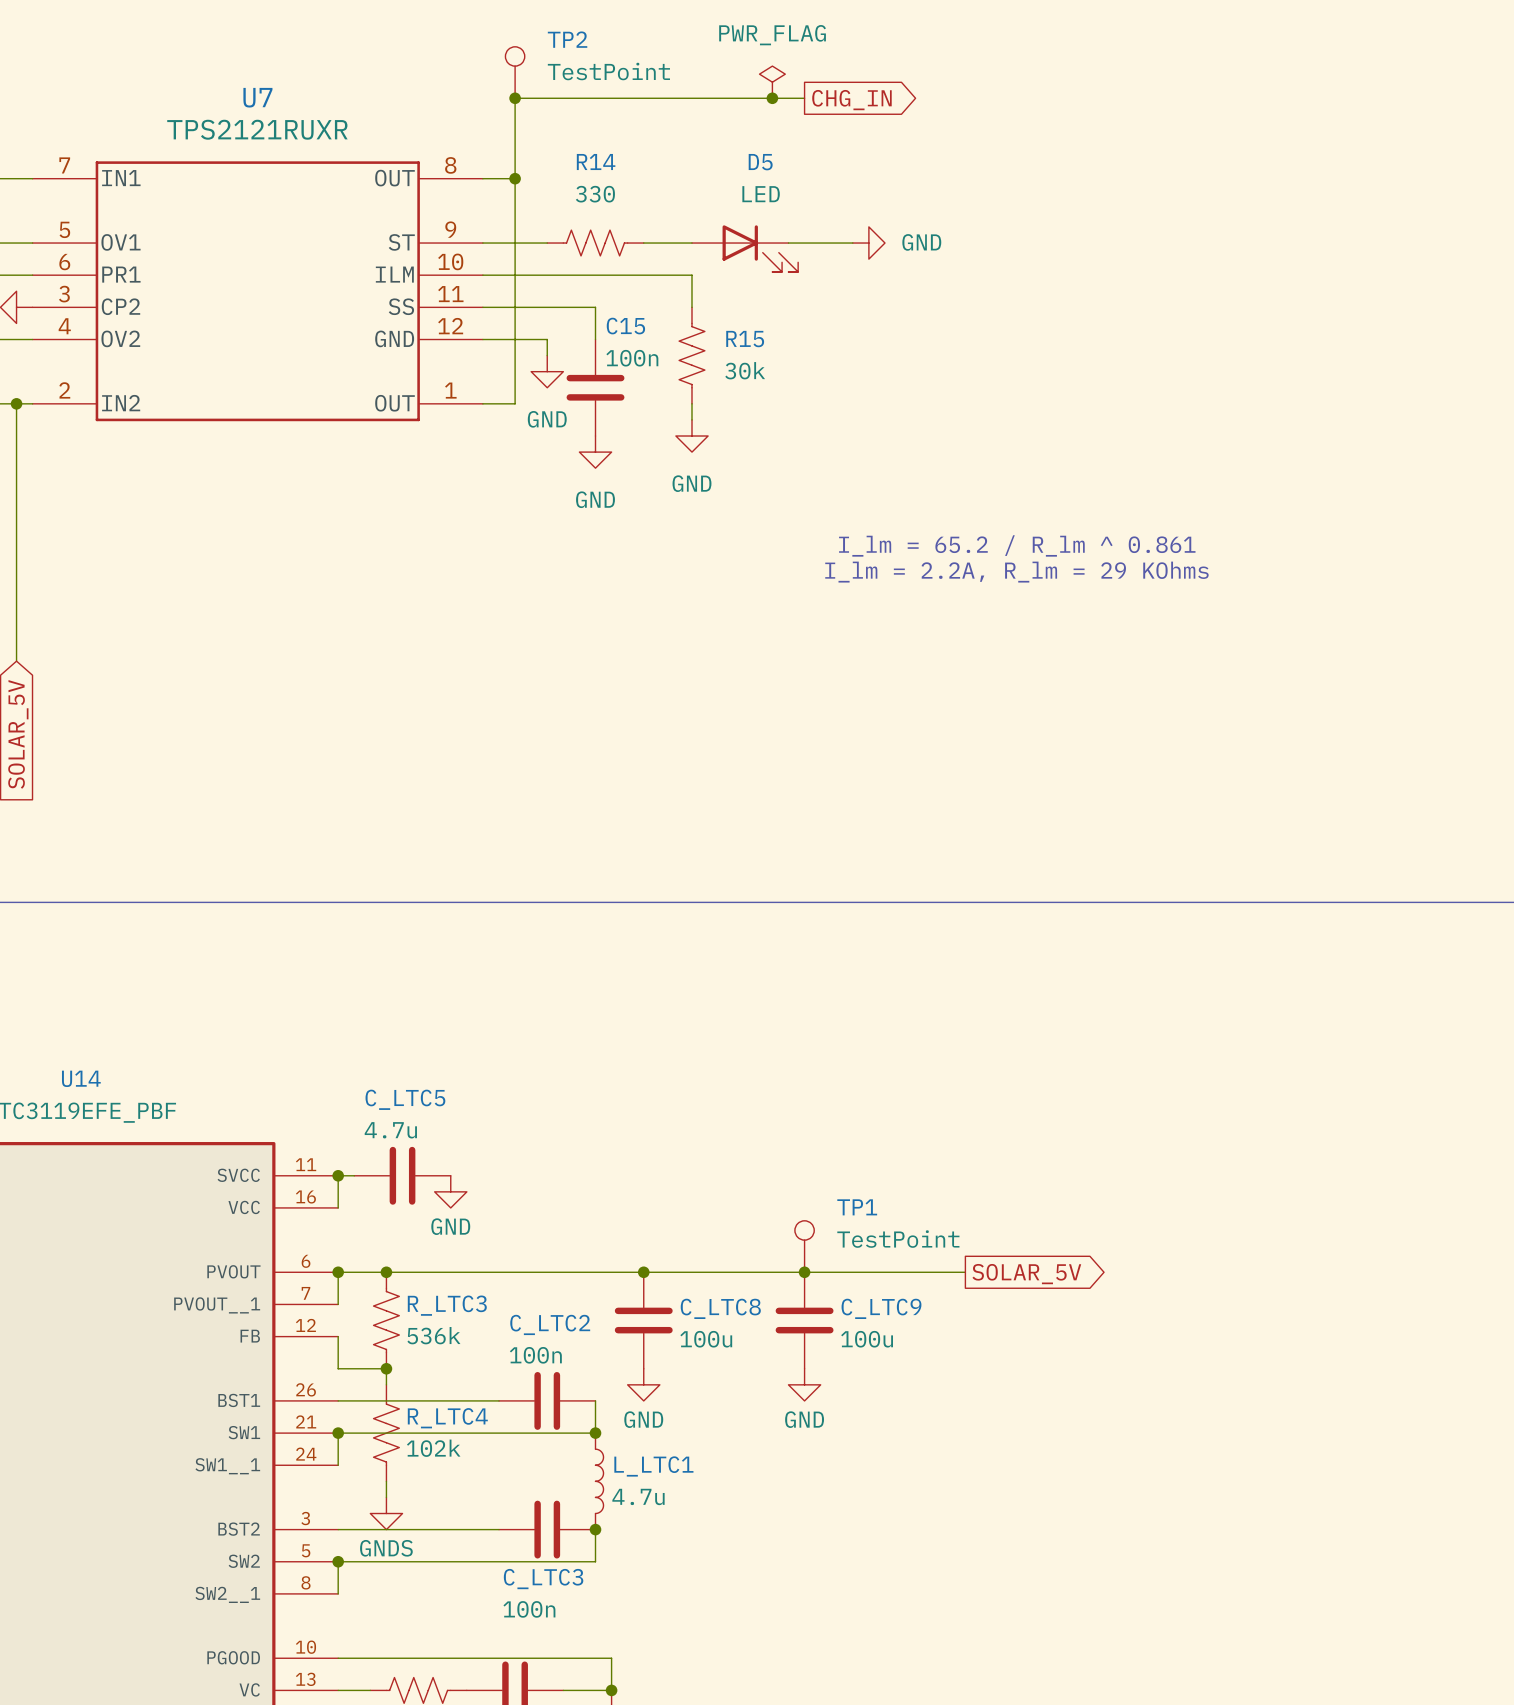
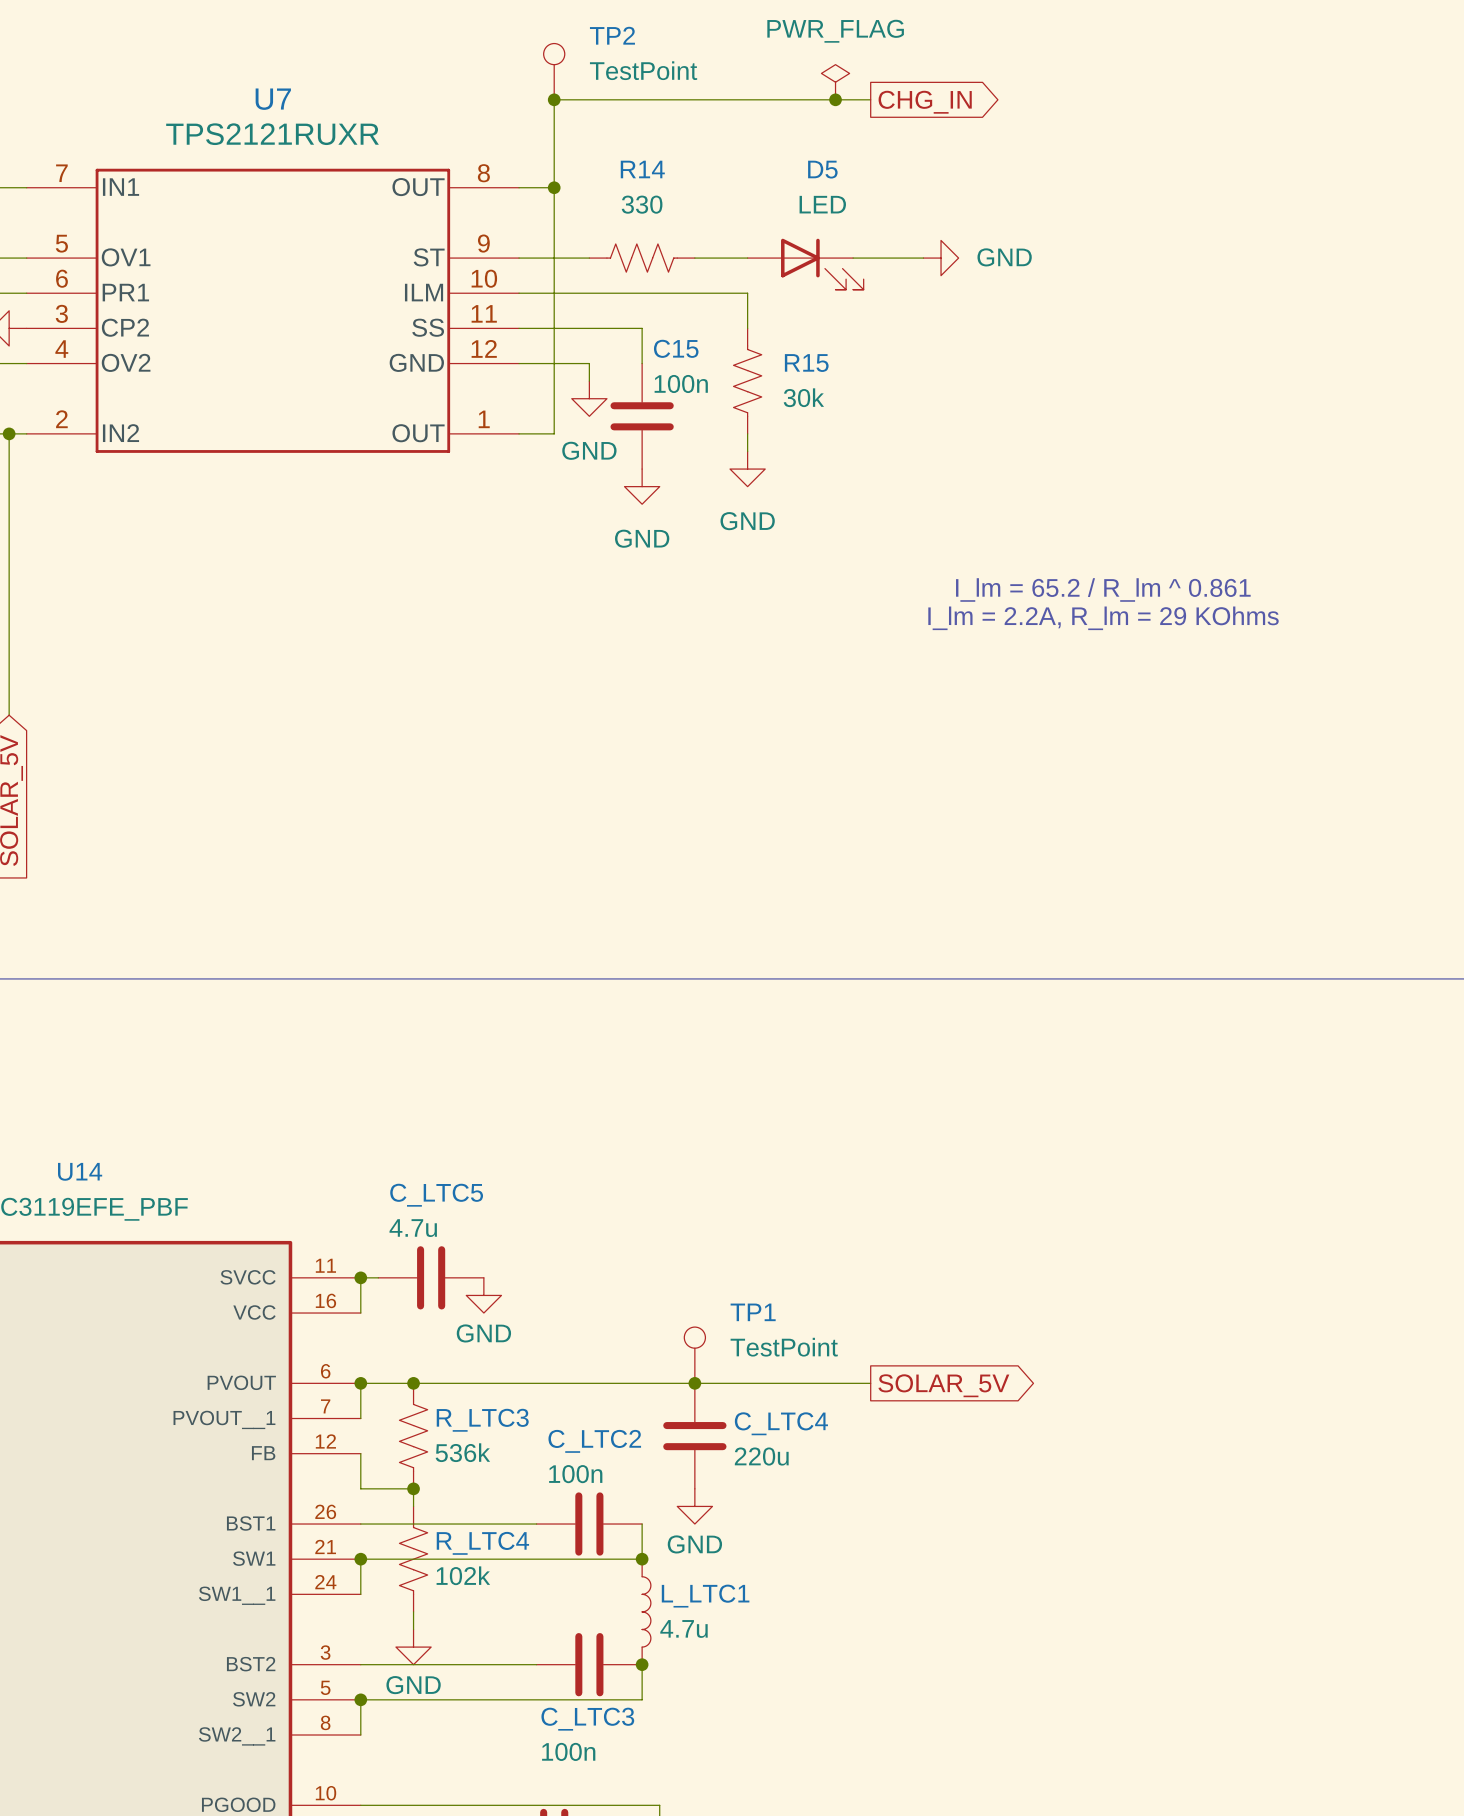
TP1 position: (804, 1246) -> (694, 1355)
wire: (804, 1272) (965, 1272) -> none
junction: (804, 1272) -> none
global label position: SOLAR_5V (1026, 1274) -> SOLAR_5V (943, 1385)
C_LTC8 name: C_LTC8 (720, 1308) -> C_LTC4 (781, 1423)
C_LTC9: 100u (804, 1320) -> none
C_LTC8 value: 100u (706, 1339) -> 220u (761, 1456)
power symbol: GND (804, 1384) -> none
power symbol: GNDS (386, 1513) -> GND (413, 1647)

